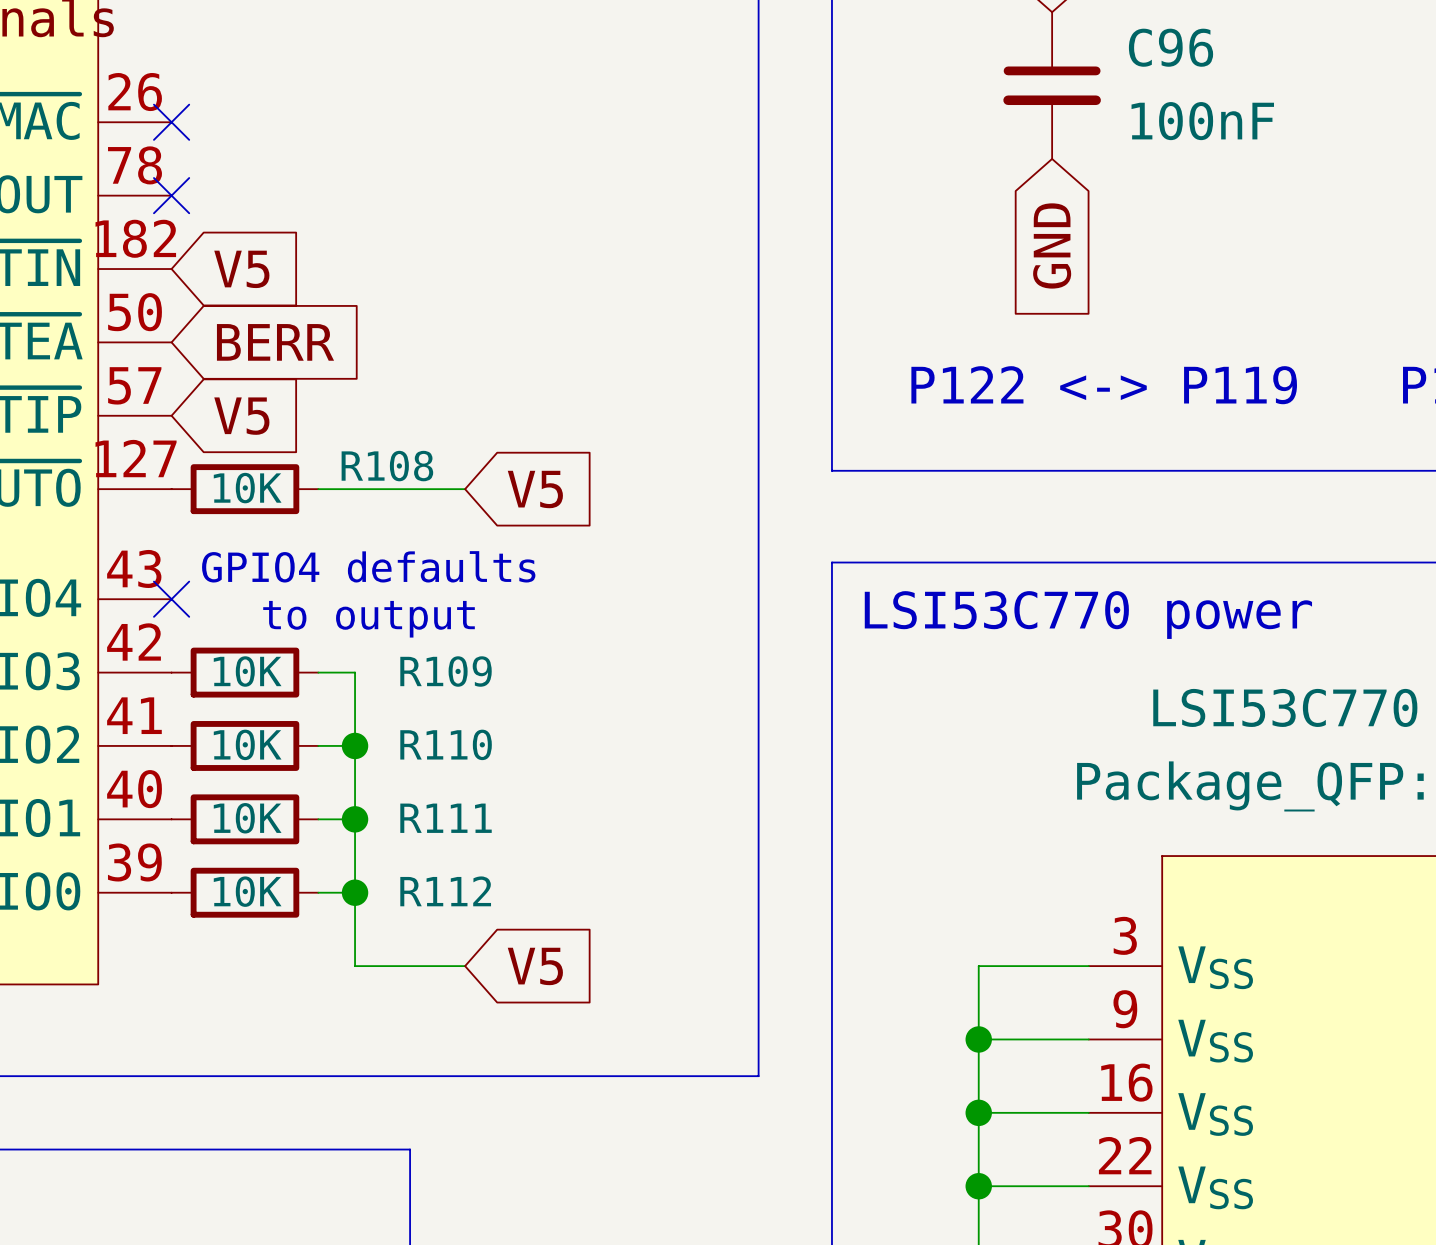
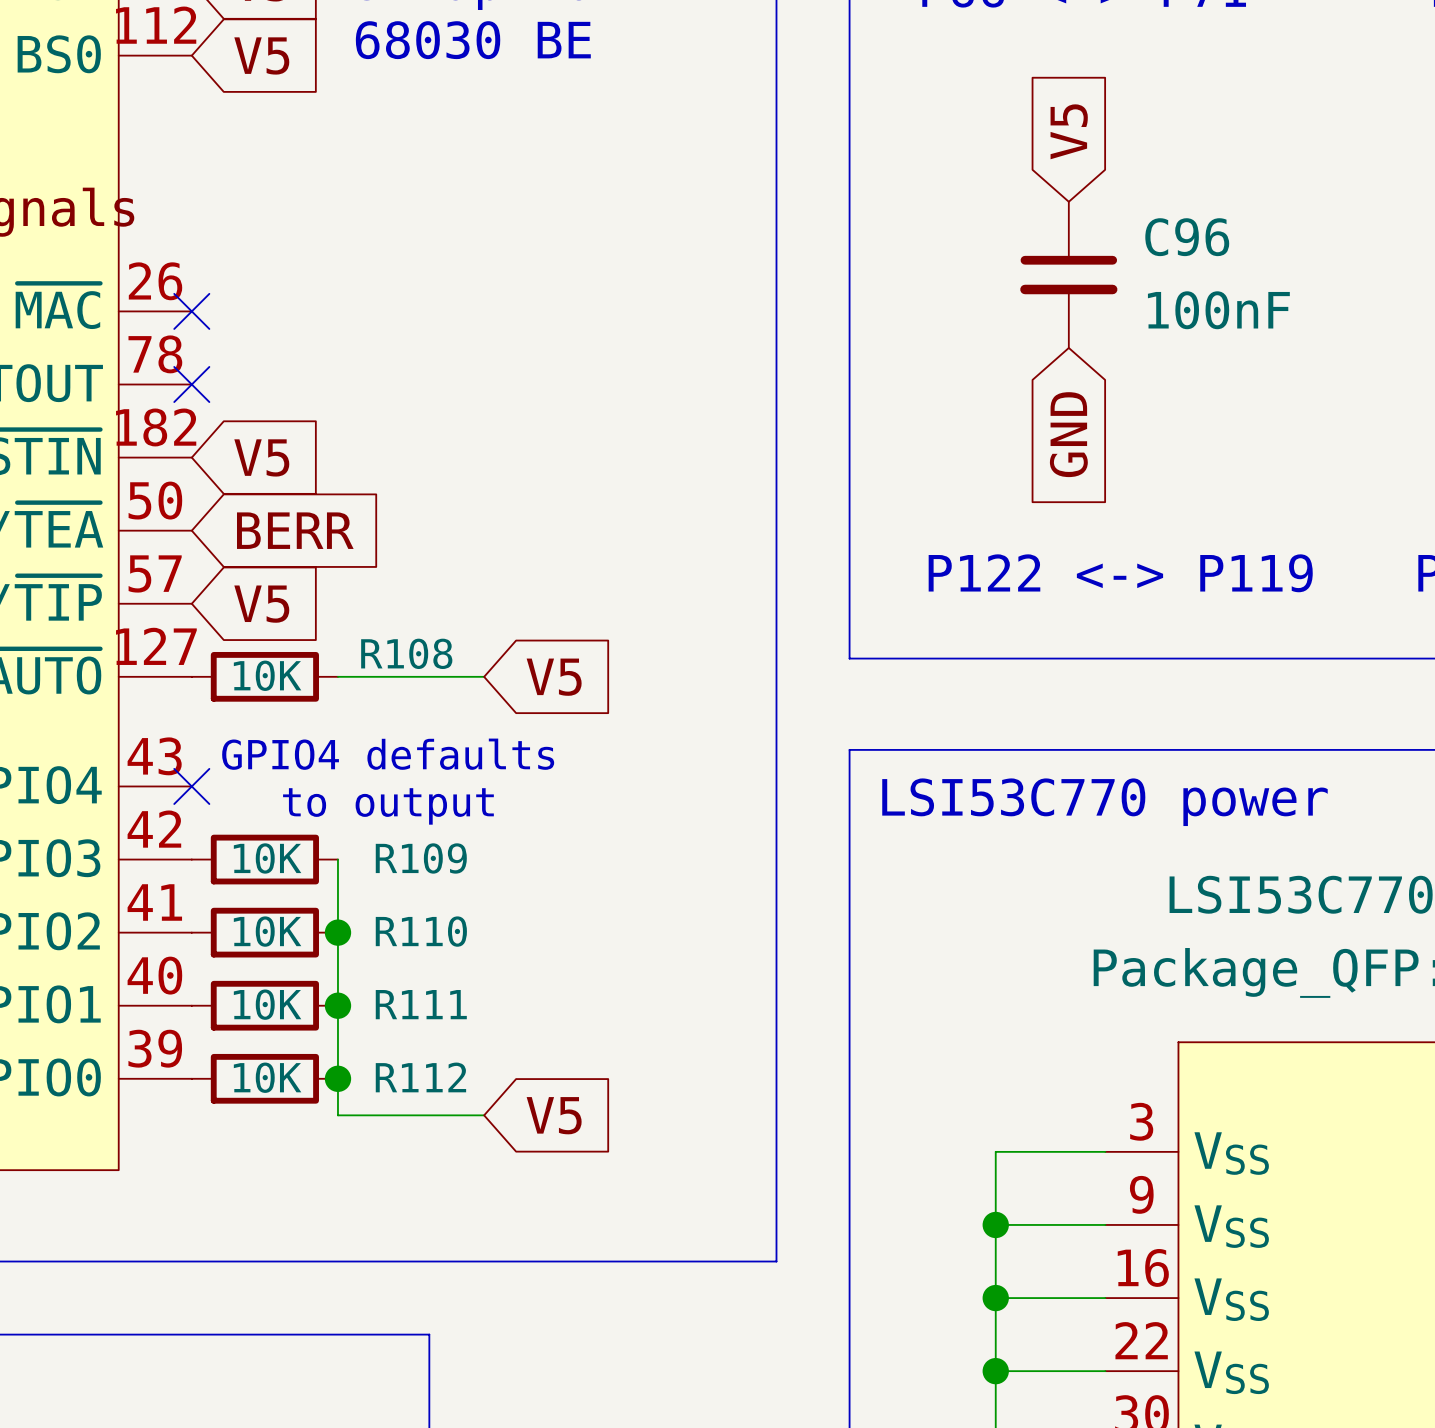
R109 name position: R109 (446, 671) -> R109 (421, 858)
wire: (318, 672) (355, 672) (355, 966) (465, 966) -> (337, 859) (337, 1115) (484, 1115)
R110 name position: R110 (446, 744) -> R110 (421, 931)
wire: (318, 745) (355, 745) -> none
junction position: (355, 745) -> (337, 932)
R111 name position: R111 (446, 818) -> R111 (421, 1004)
wire: (318, 819) (355, 819) -> none
junction position: (355, 819) -> (337, 1005)
R112 name position: R112 (445, 891) -> R112 (420, 1077)
wire: (318, 892) (355, 892) -> none
junction position: (355, 892) -> (337, 1078)
global label position: V5 (535, 966) -> V5 (554, 1115)

